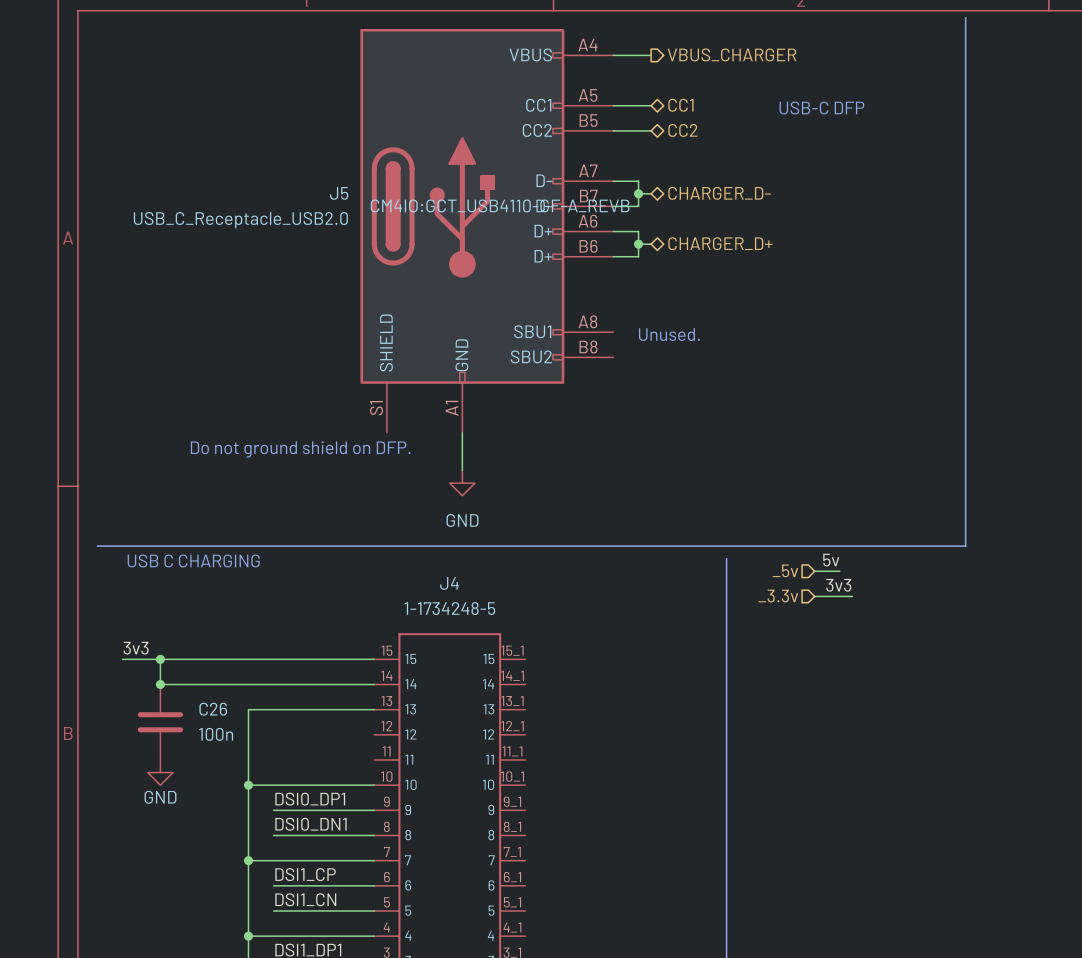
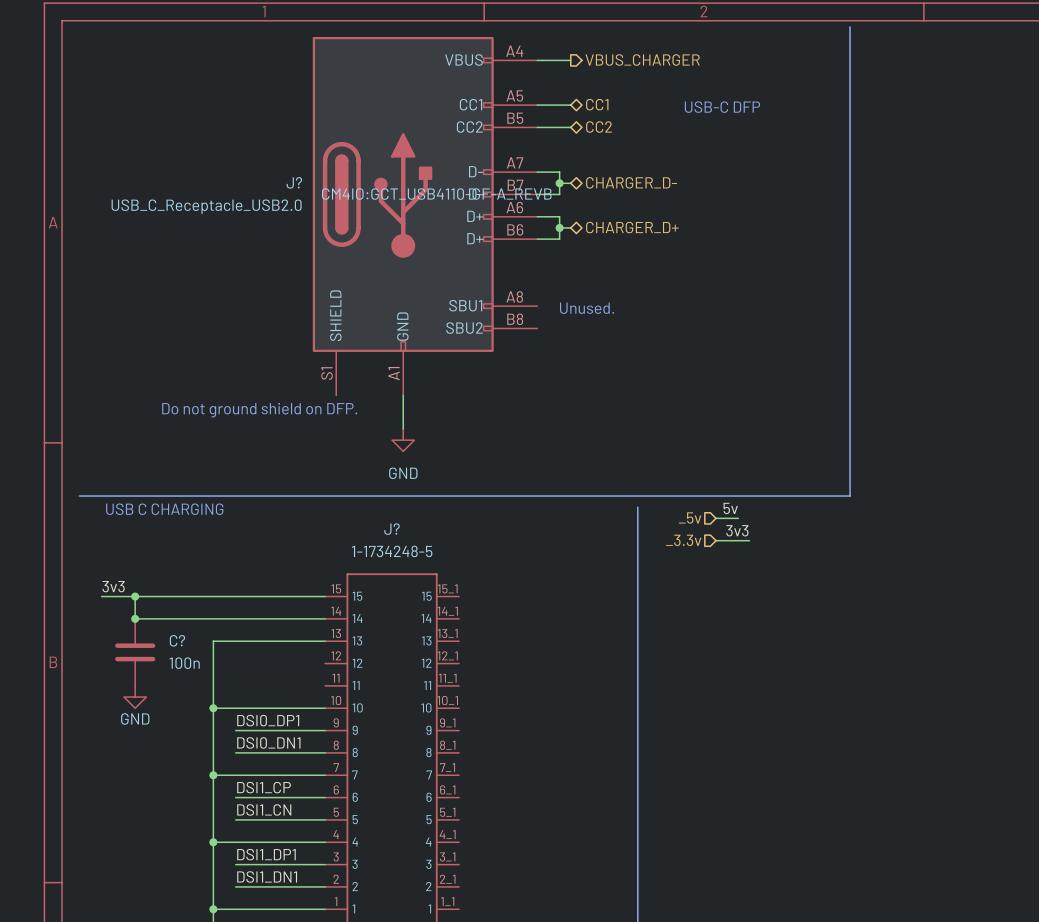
J5 name: J5 (339, 193) -> J? (294, 182)
J4 name: J4 (449, 583) -> J? (391, 529)
C26 name: C26 (213, 709) -> C? (177, 640)

